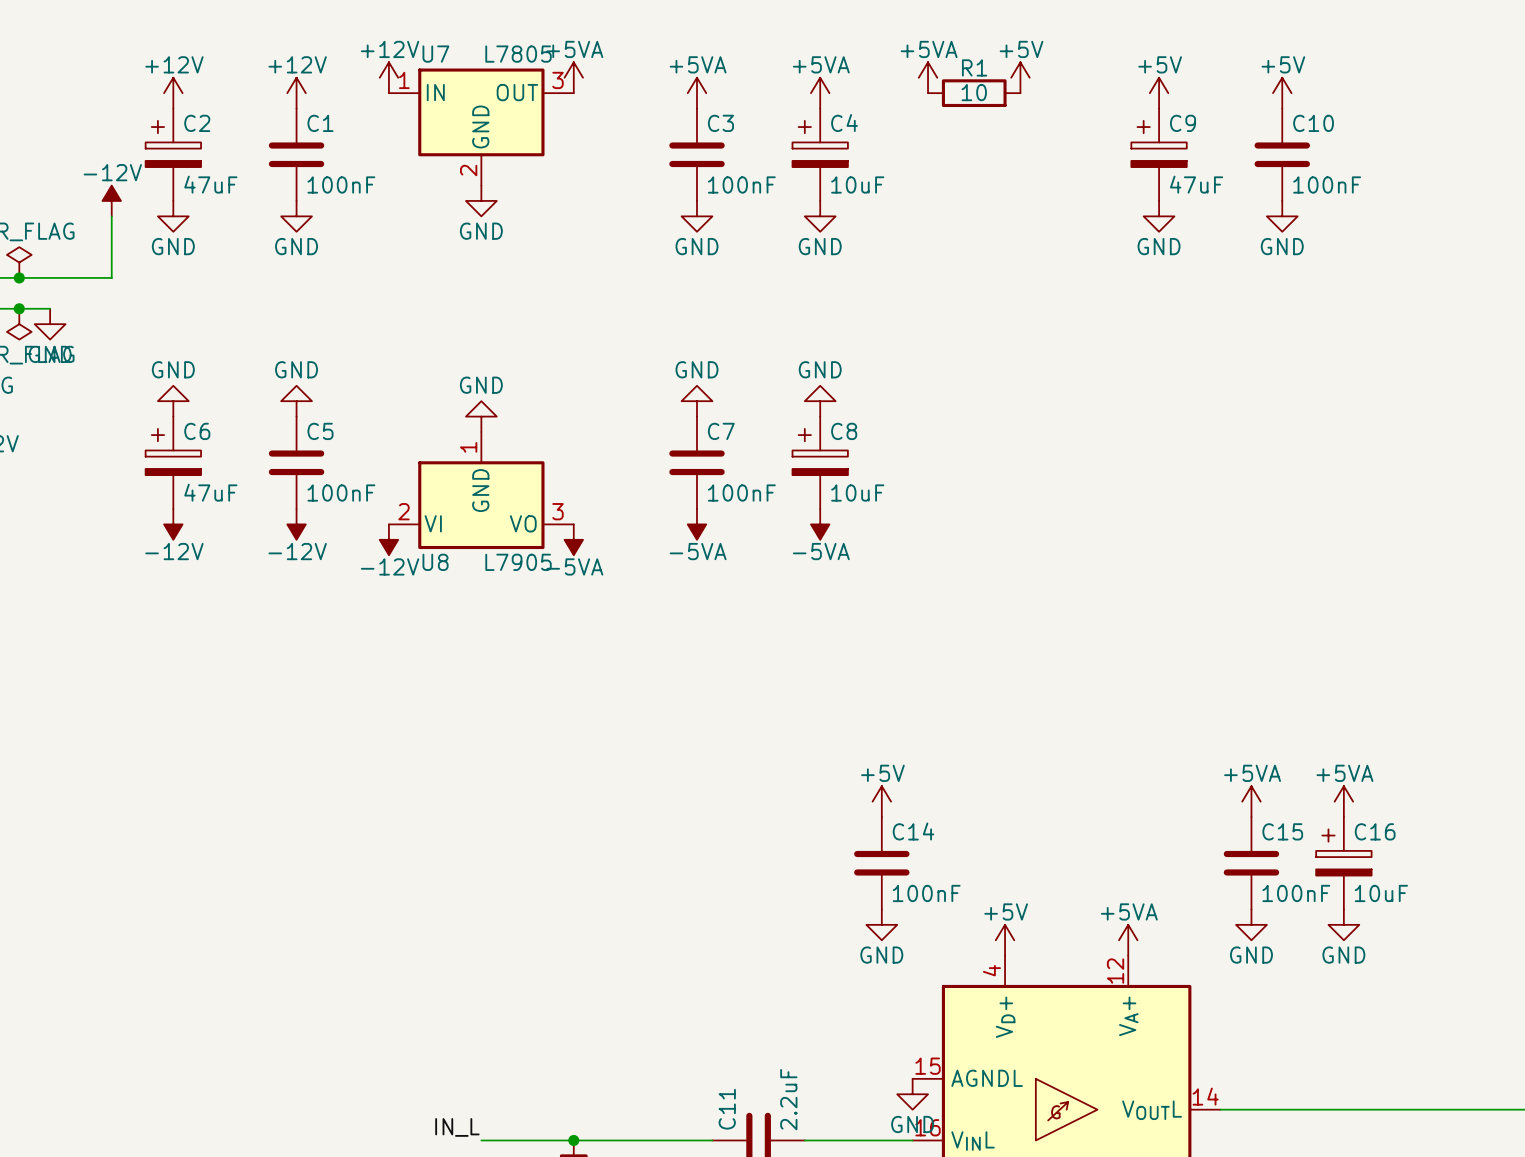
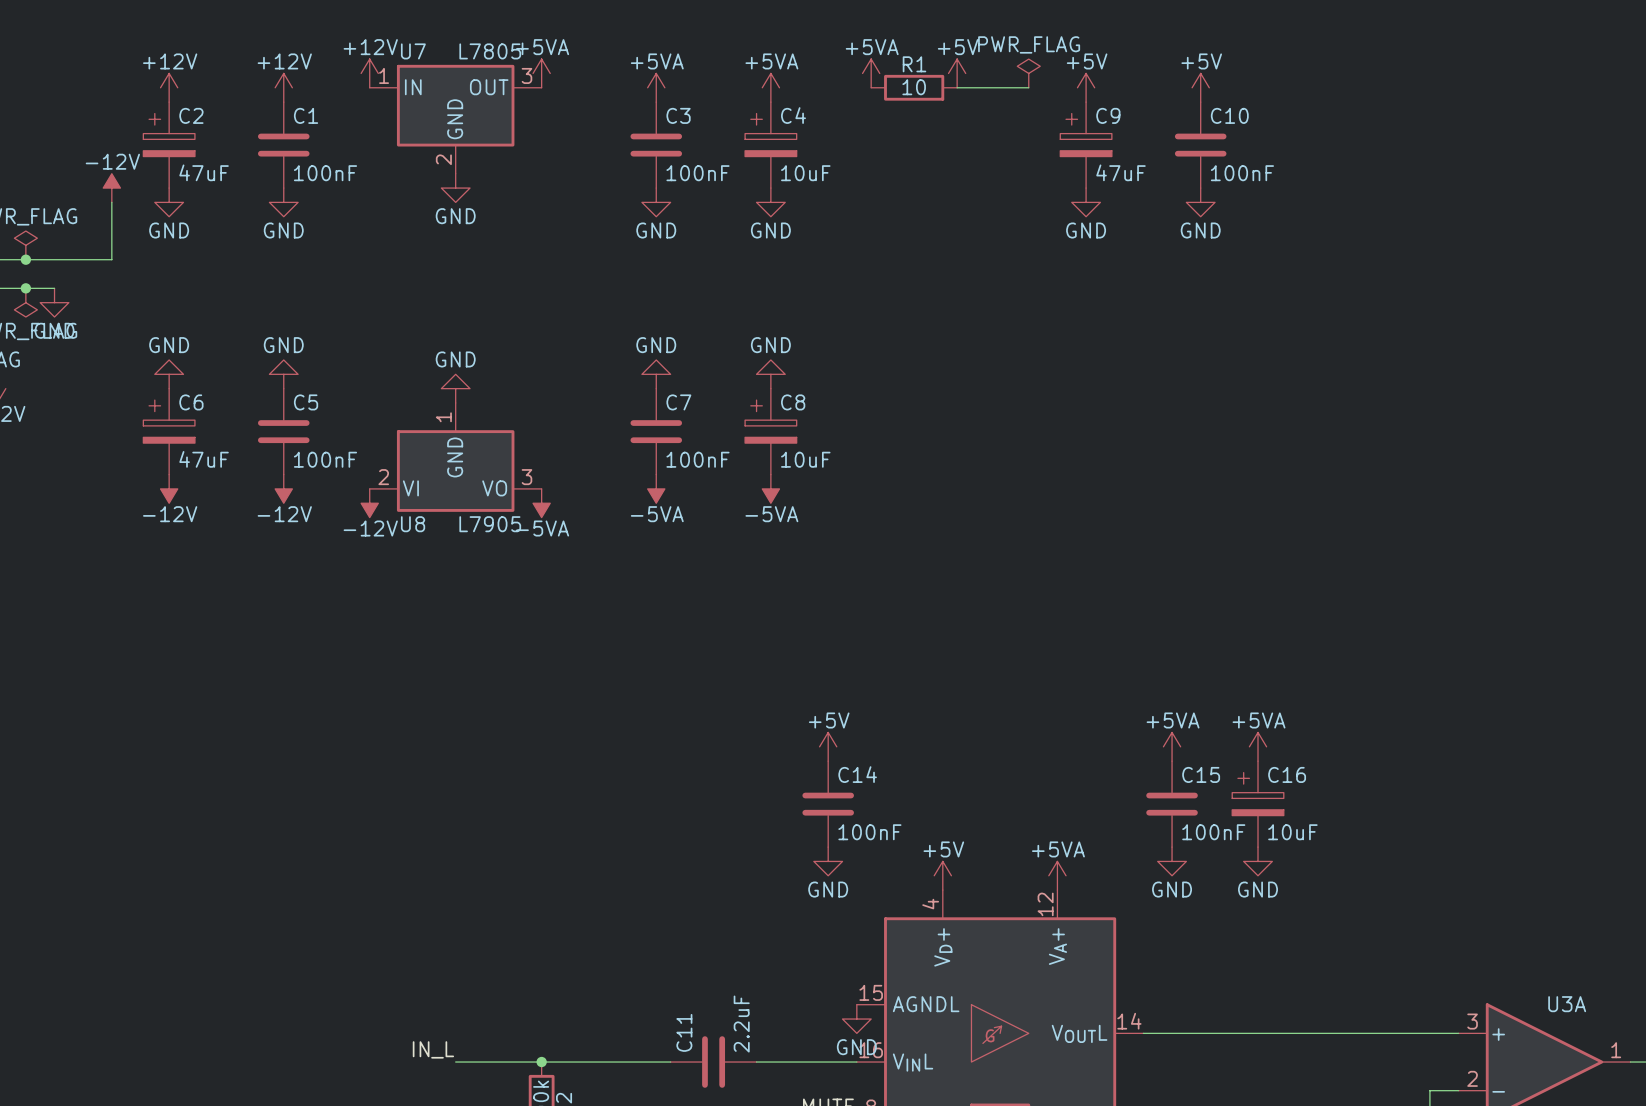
power symbol: none -> PWR_FLAG (1028, 73)
wire: none -> (957, 87) (1028, 87)

